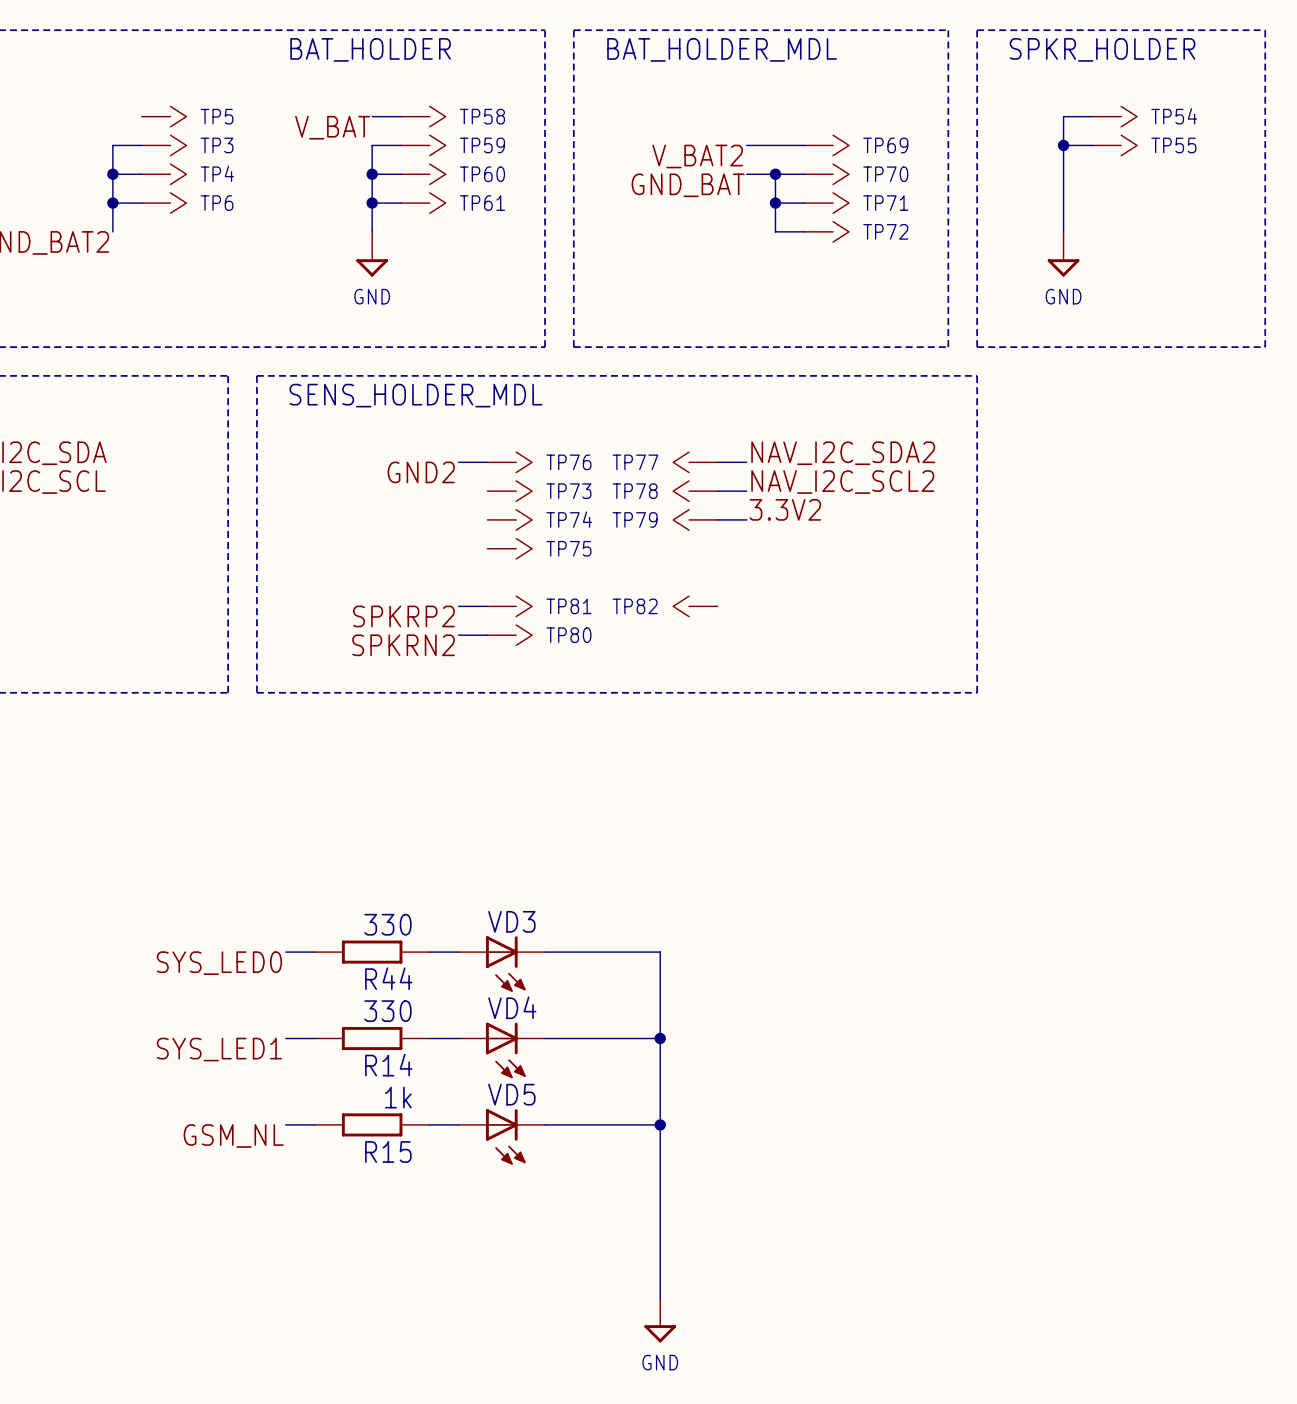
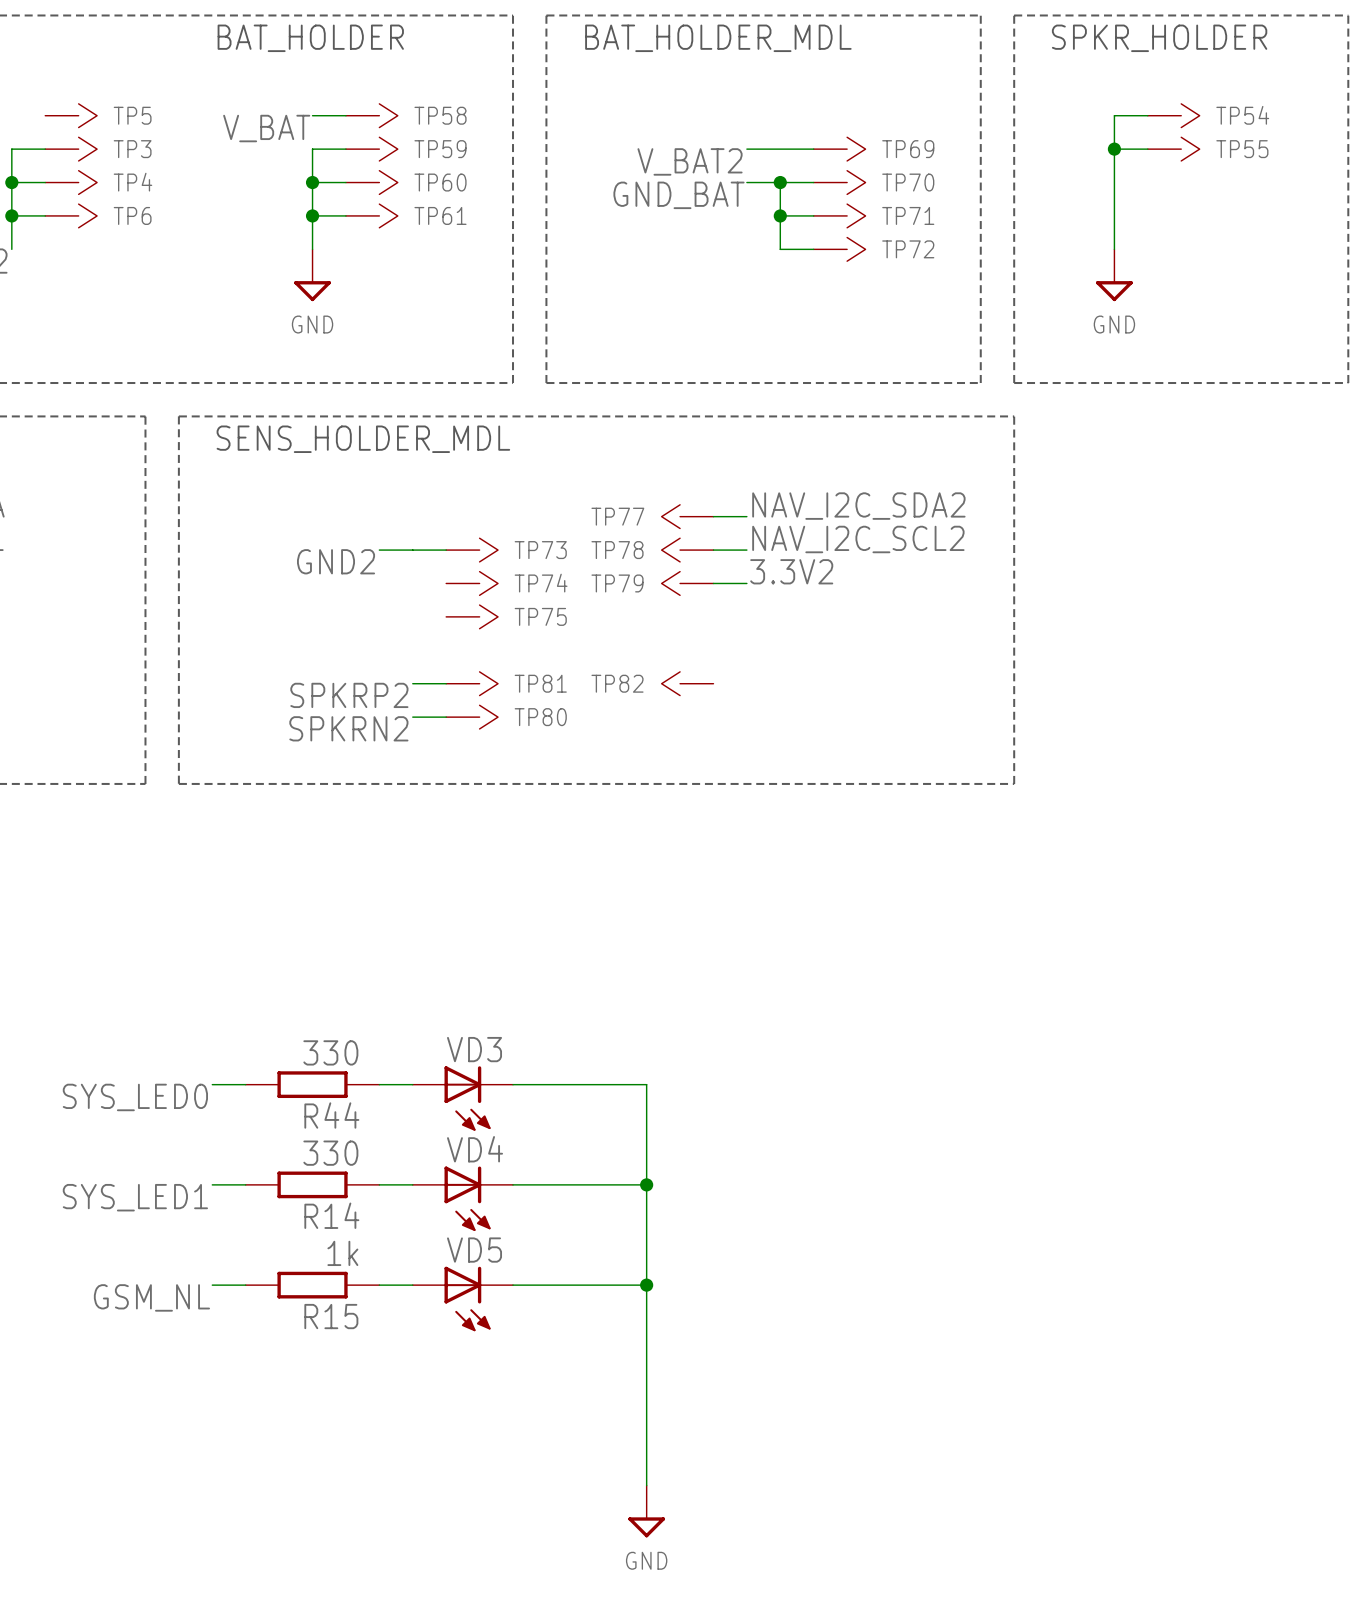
wire: (458, 462) (487, 462) -> none
TP76: (509, 462) -> none
label position: GND2 (421, 472) -> GND2 (336, 561)
wire: none -> (379, 550) (446, 550)

